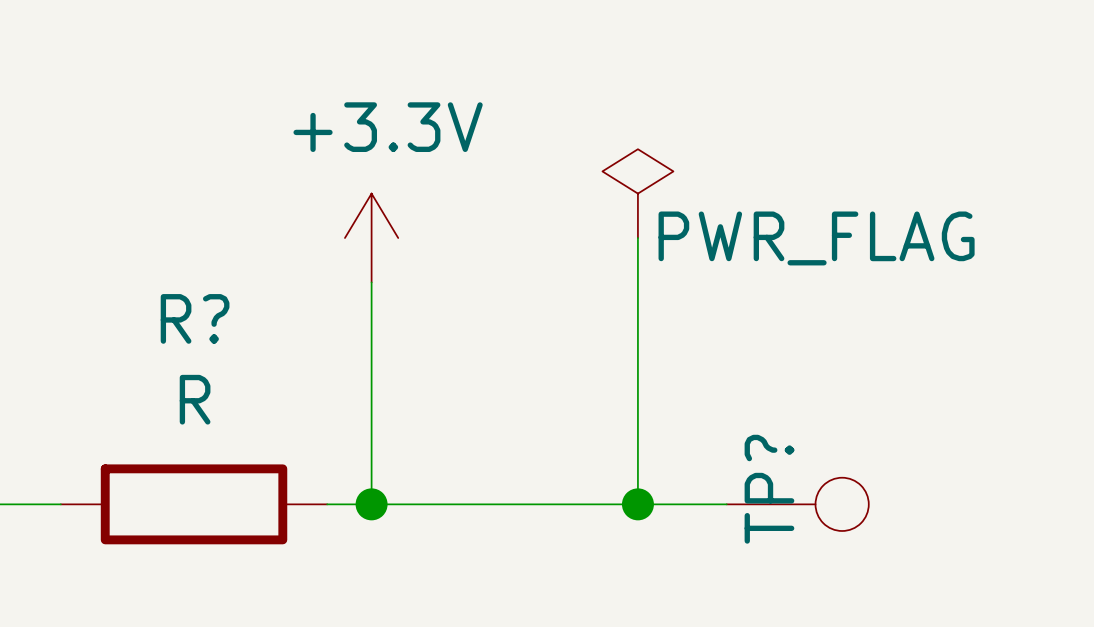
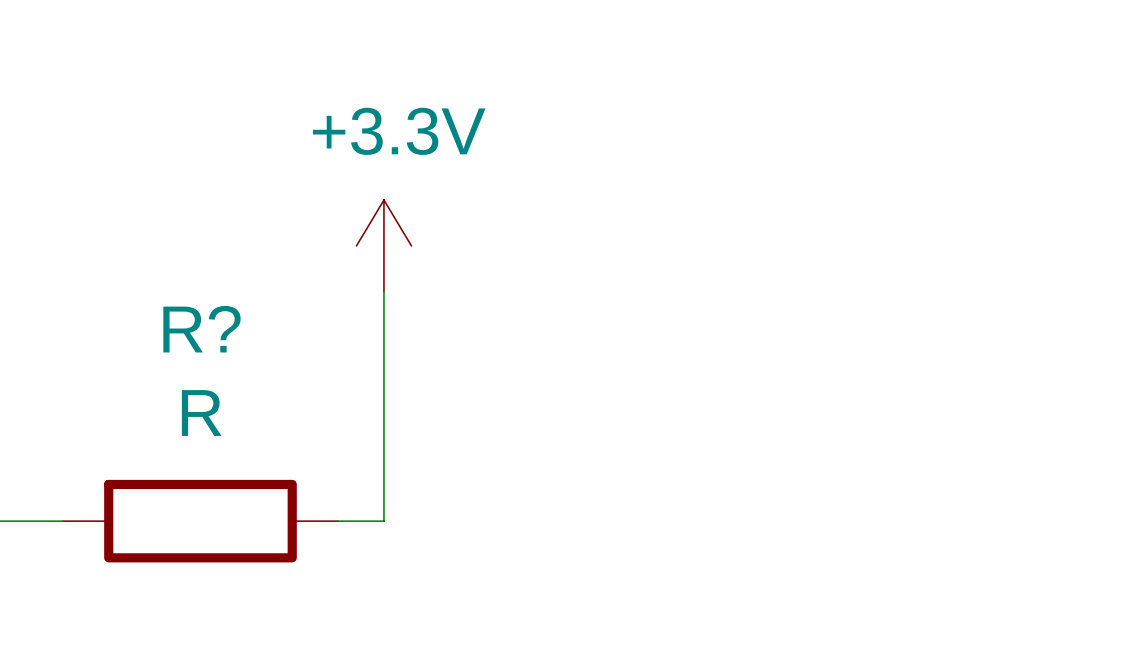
power symbol: PWR_FLAG (637, 193) -> none
wire: (637, 238) (637, 504) -> none
wire: (371, 504) (726, 504) -> none
junction: (371, 504) -> none
junction: (637, 504) -> none
TP?: (797, 504) -> none

